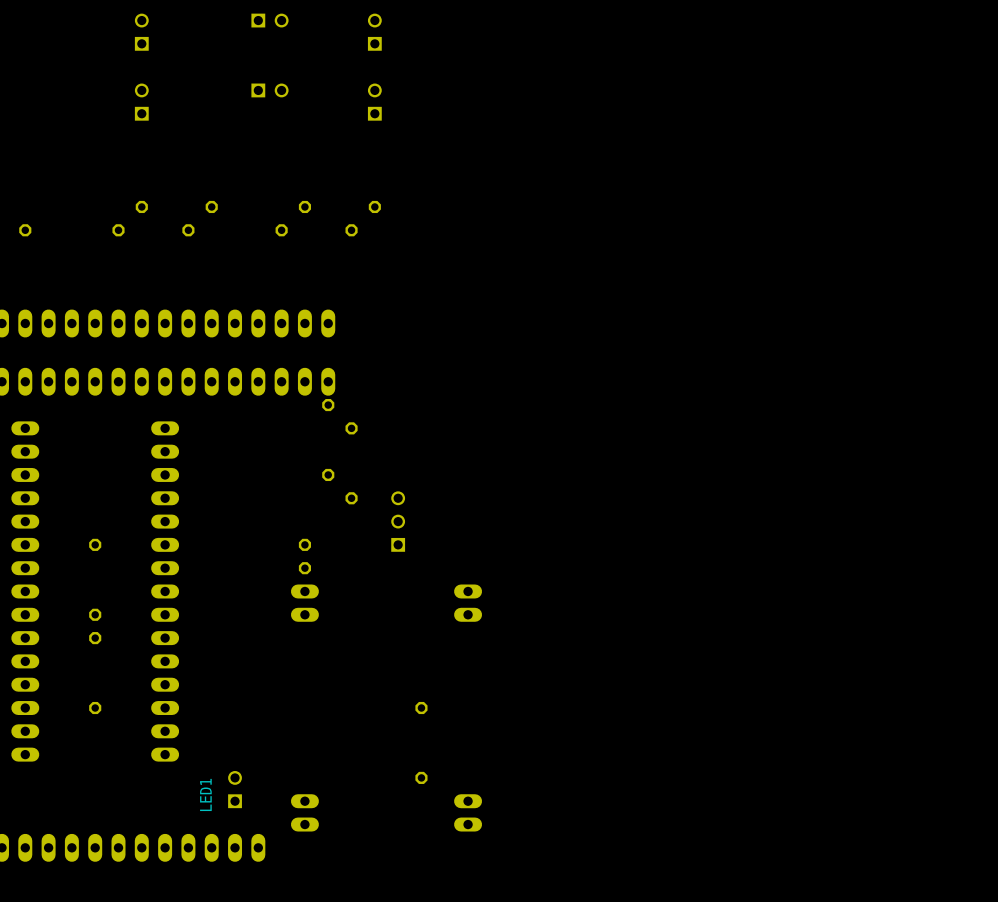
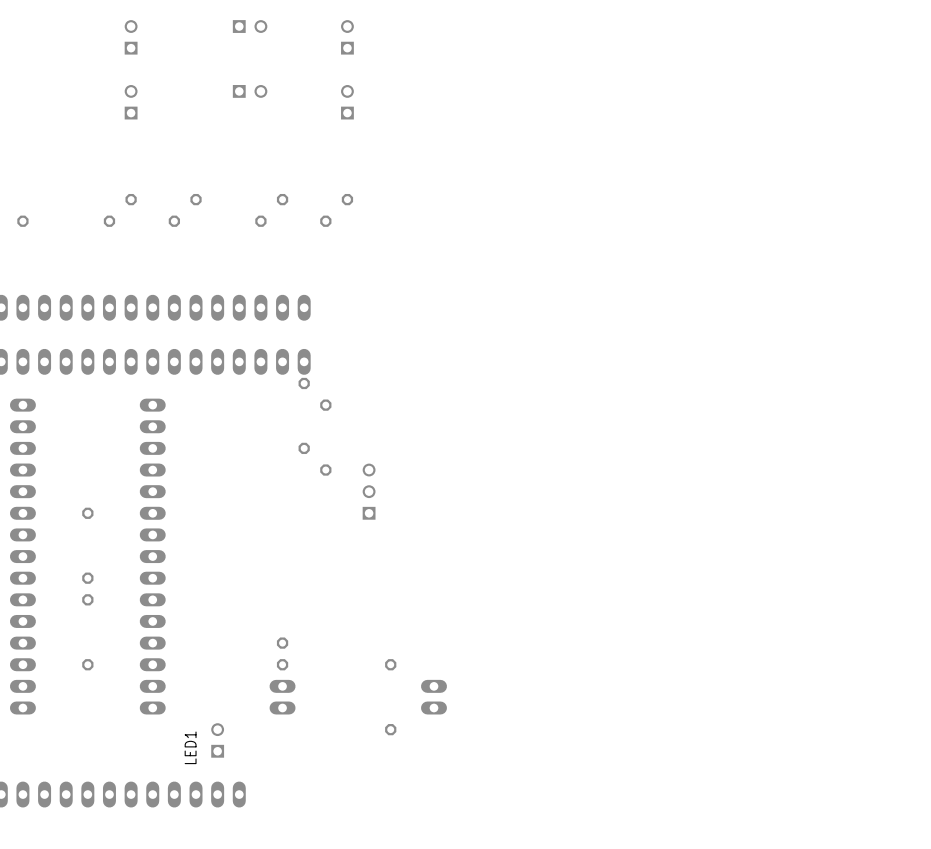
part position: (304, 556) -> (282, 653)
part: (304, 603) -> none
part: (468, 603) -> none
part: none -> (282, 697)
part: none -> (433, 697)
part: (304, 812) -> none
part: (468, 812) -> none

